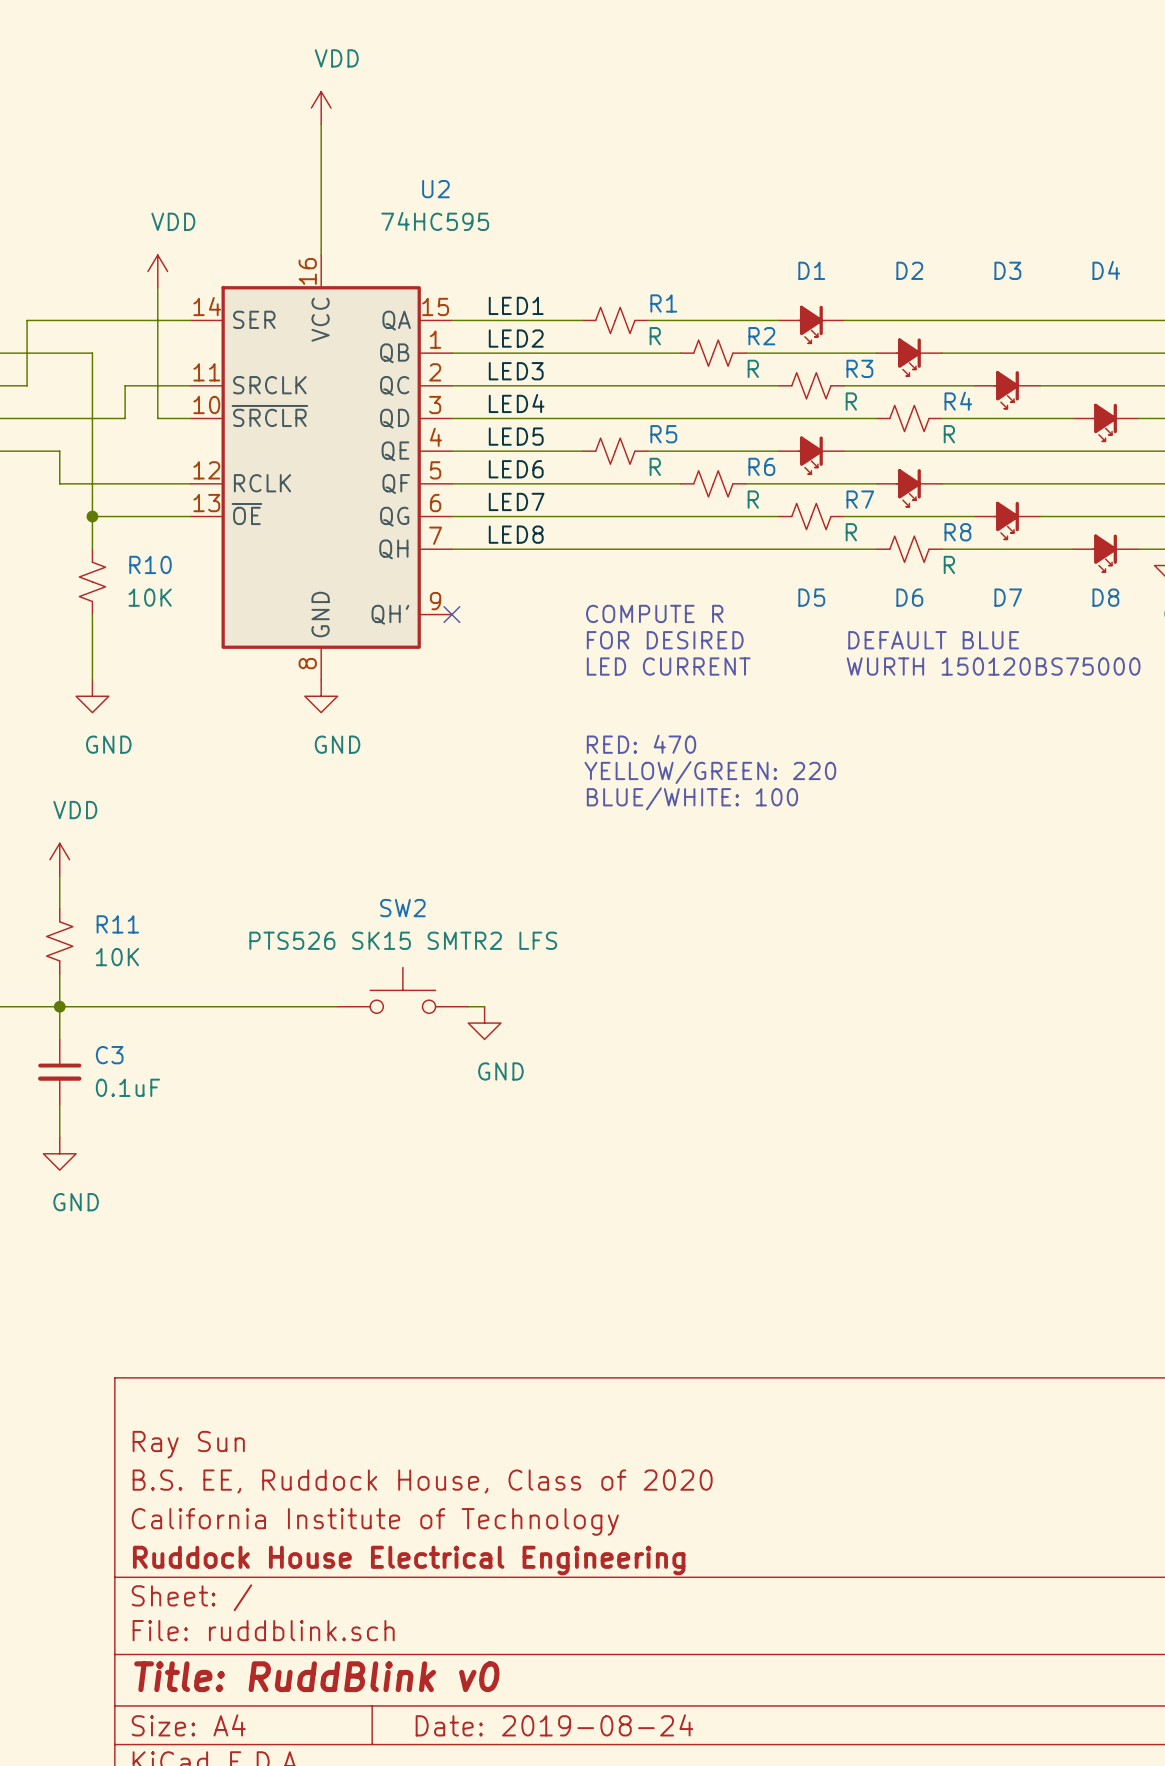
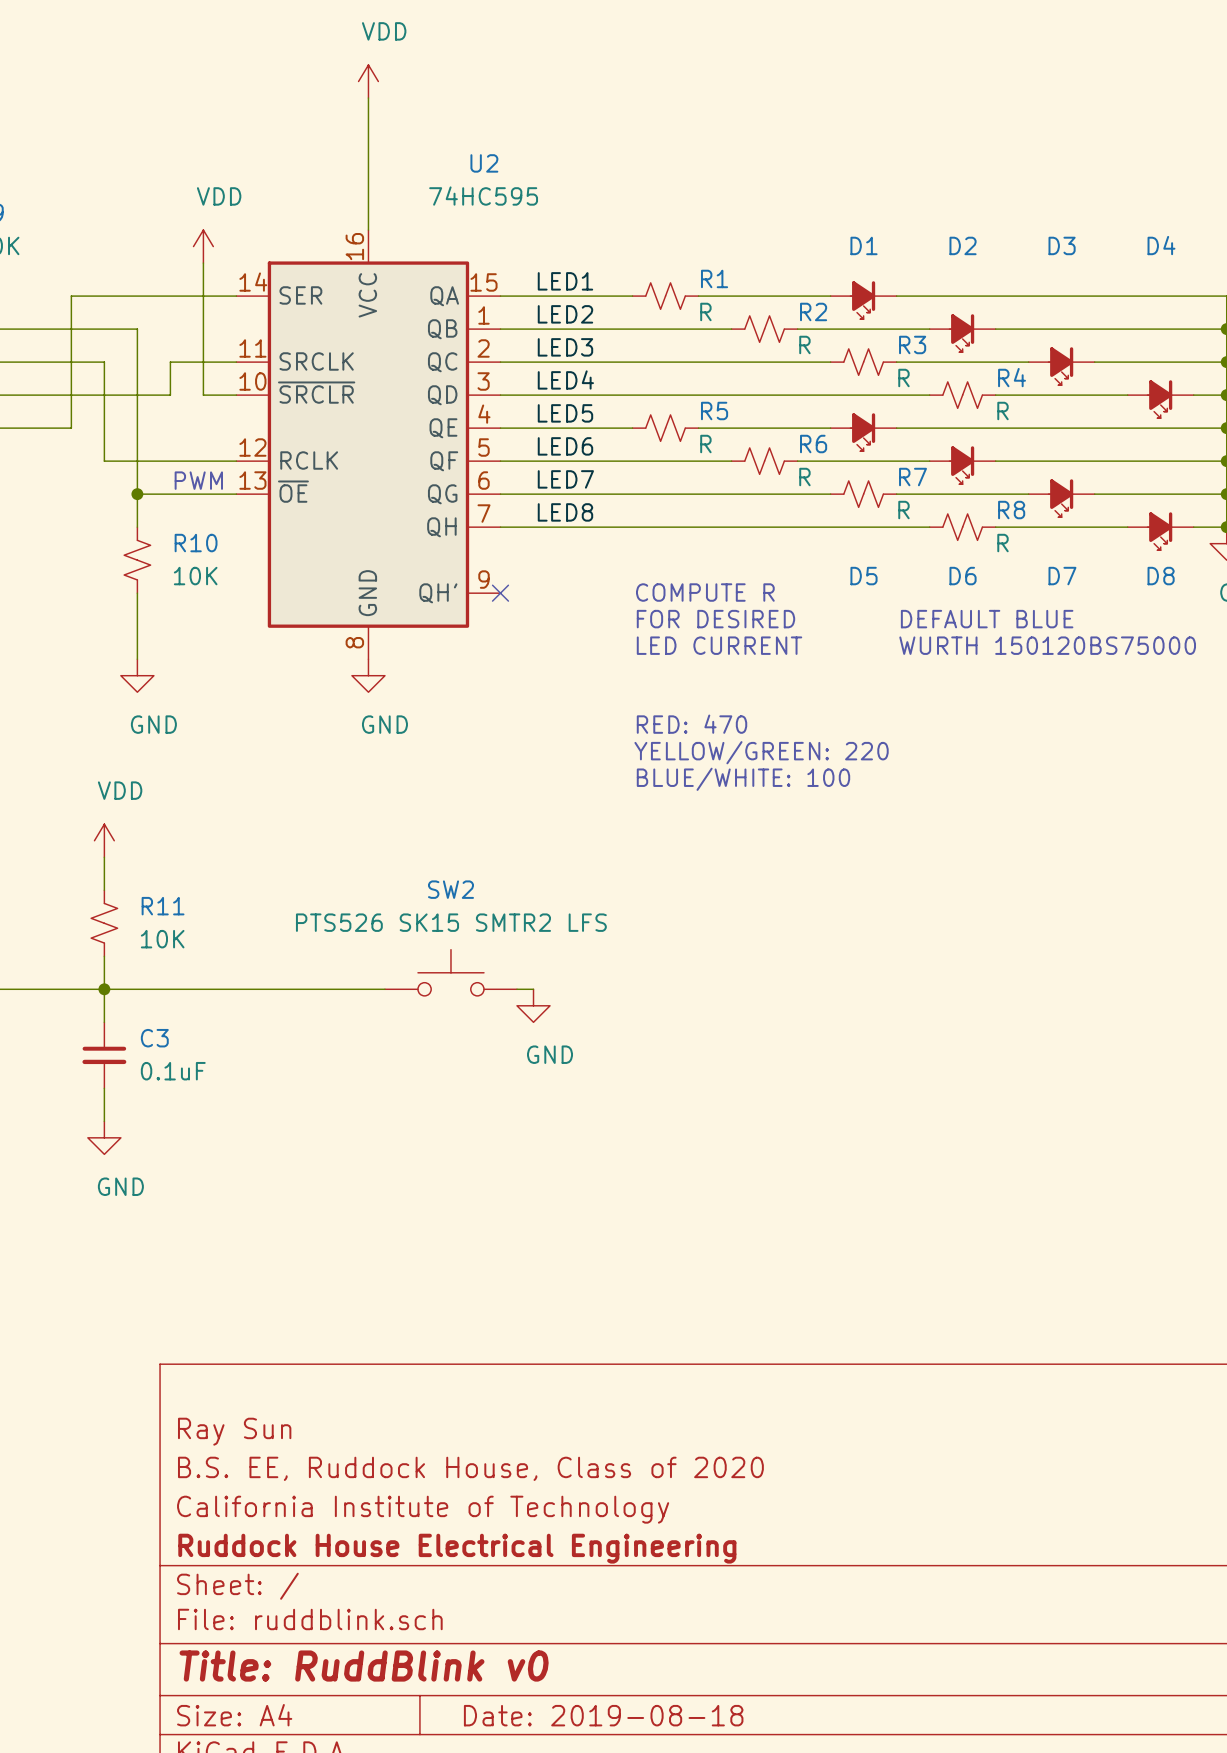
wire: (27, 451) (59, 451) -> (71, 428) (71, 362) (104, 362) (104, 428)
text: none -> PWM (198, 480)
title block: Date: 2019-08-24 (554, 1725) -> Date: 2019-08-18 (603, 1715)

